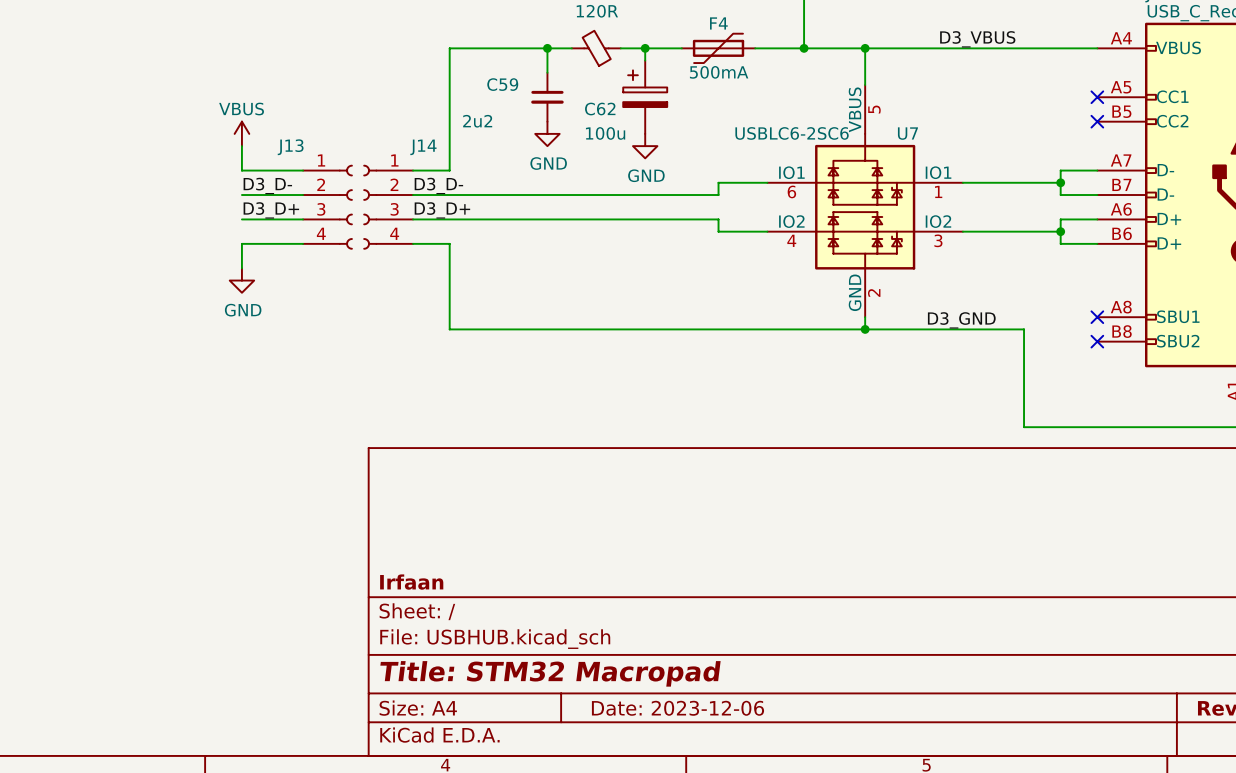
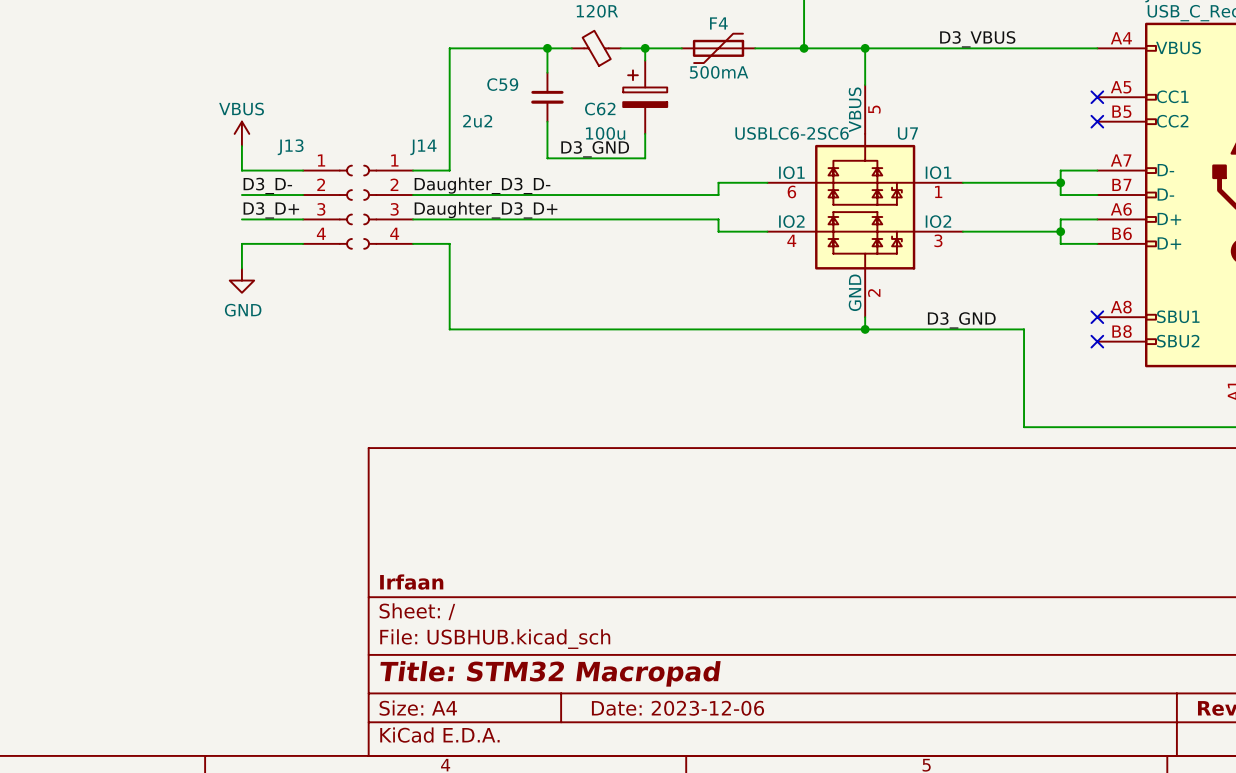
wire: none -> (547, 121) (547, 158) (645, 158) (645, 133)
power symbol: GND (547, 133) -> none
power symbol: GND (645, 146) -> none
label: none -> D3_GND (595, 149)
label: D3_D- (438, 185) -> Daughter_D3_D- (482, 185)
label: D3_D+ (442, 210) -> Daughter_D3_D+ (486, 210)

